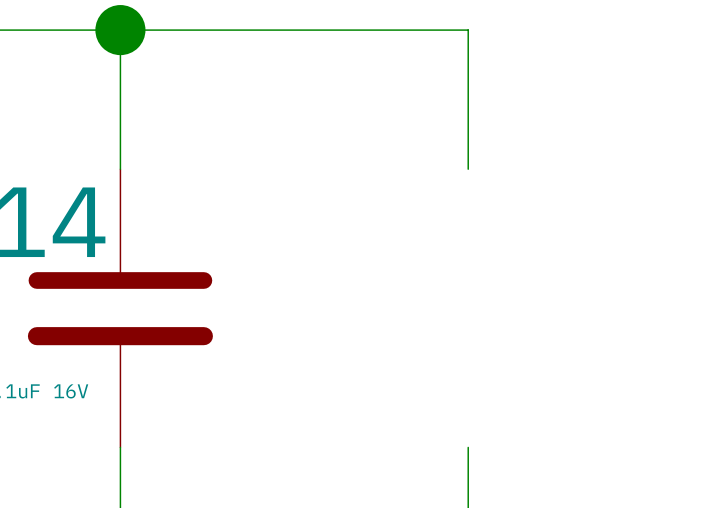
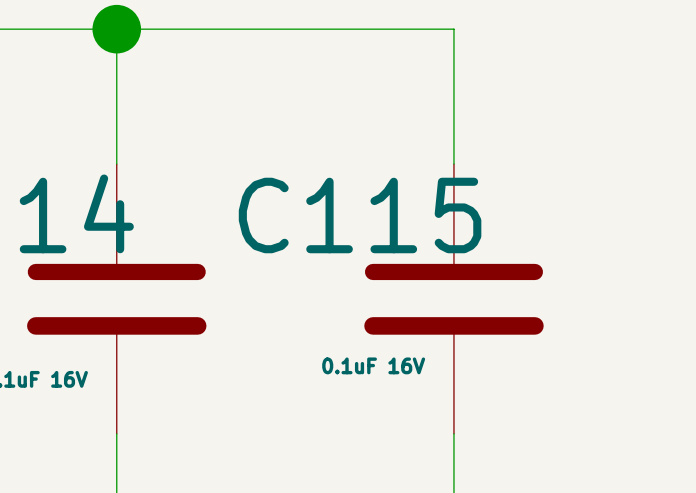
C115: none -> 0.1uF 16V (453, 298)

